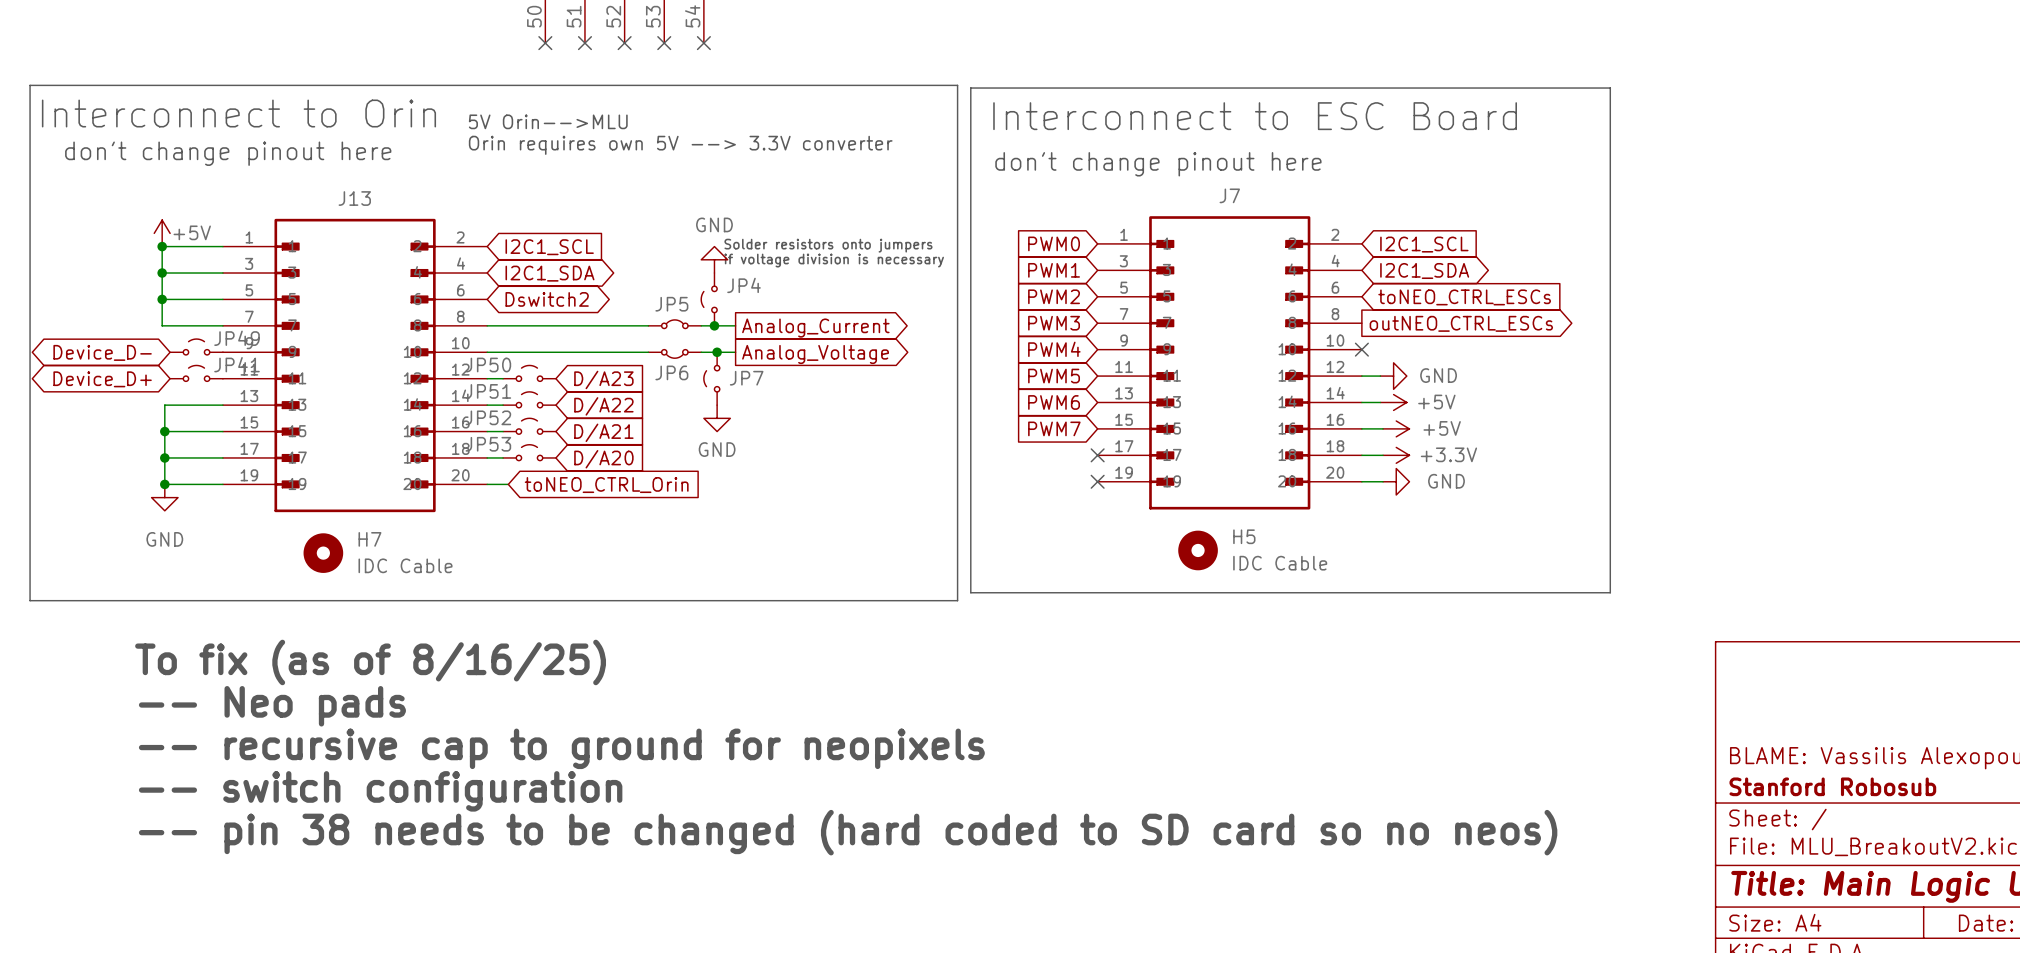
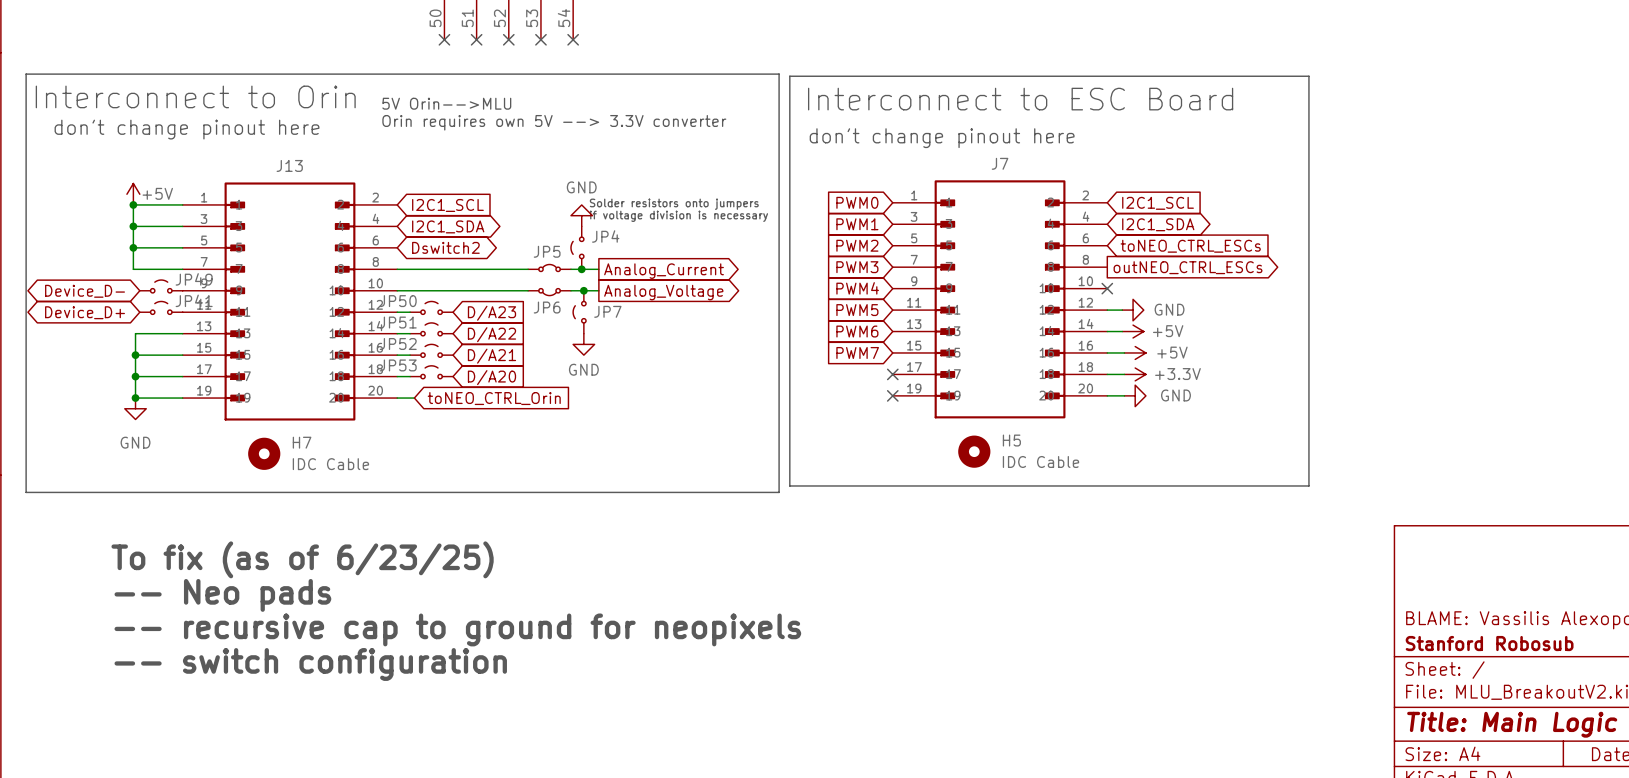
text: To fix (as of 8/16/25) (370, 662) -> To fix (as of 6/23/25) (302, 559)
text position: -- Neo pads (272, 706) -> -- Neo pads (222, 595)
text position: -- recursive cap to ground for neopixels (561, 748) -> -- recursive cap to ground for neopixels (457, 629)
text position: -- switch configuration (380, 791) -> -- switch configuration (310, 664)
text: -- pin 38 needs to be changed (hard coded to SD card so no neos) (848, 832) -> none

